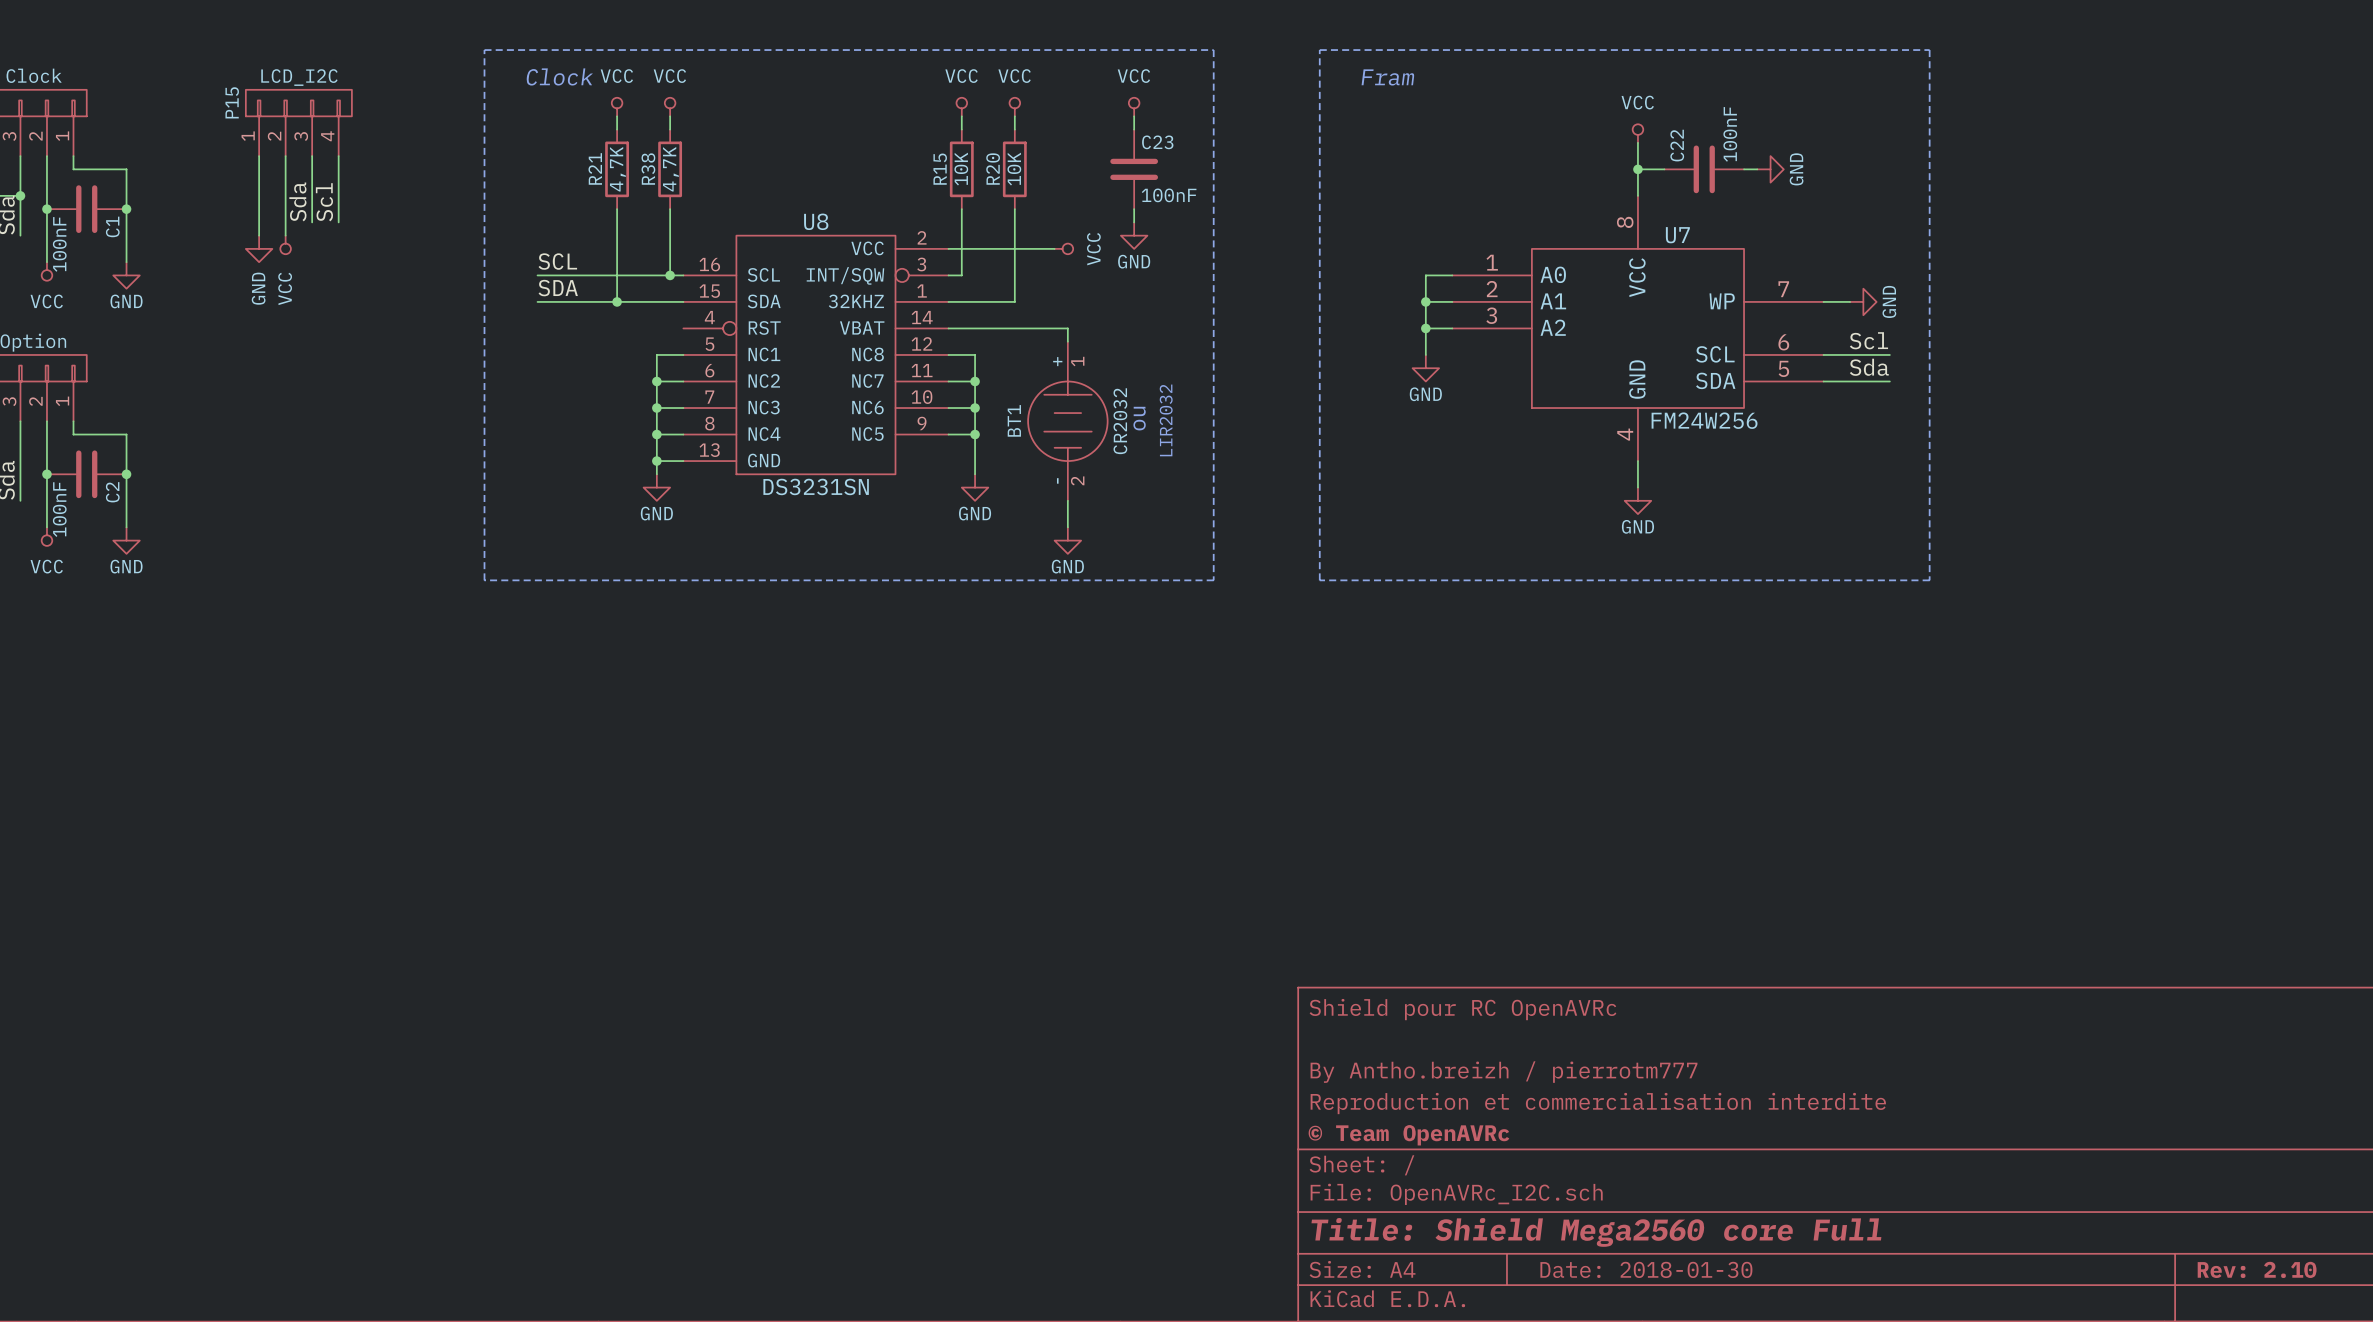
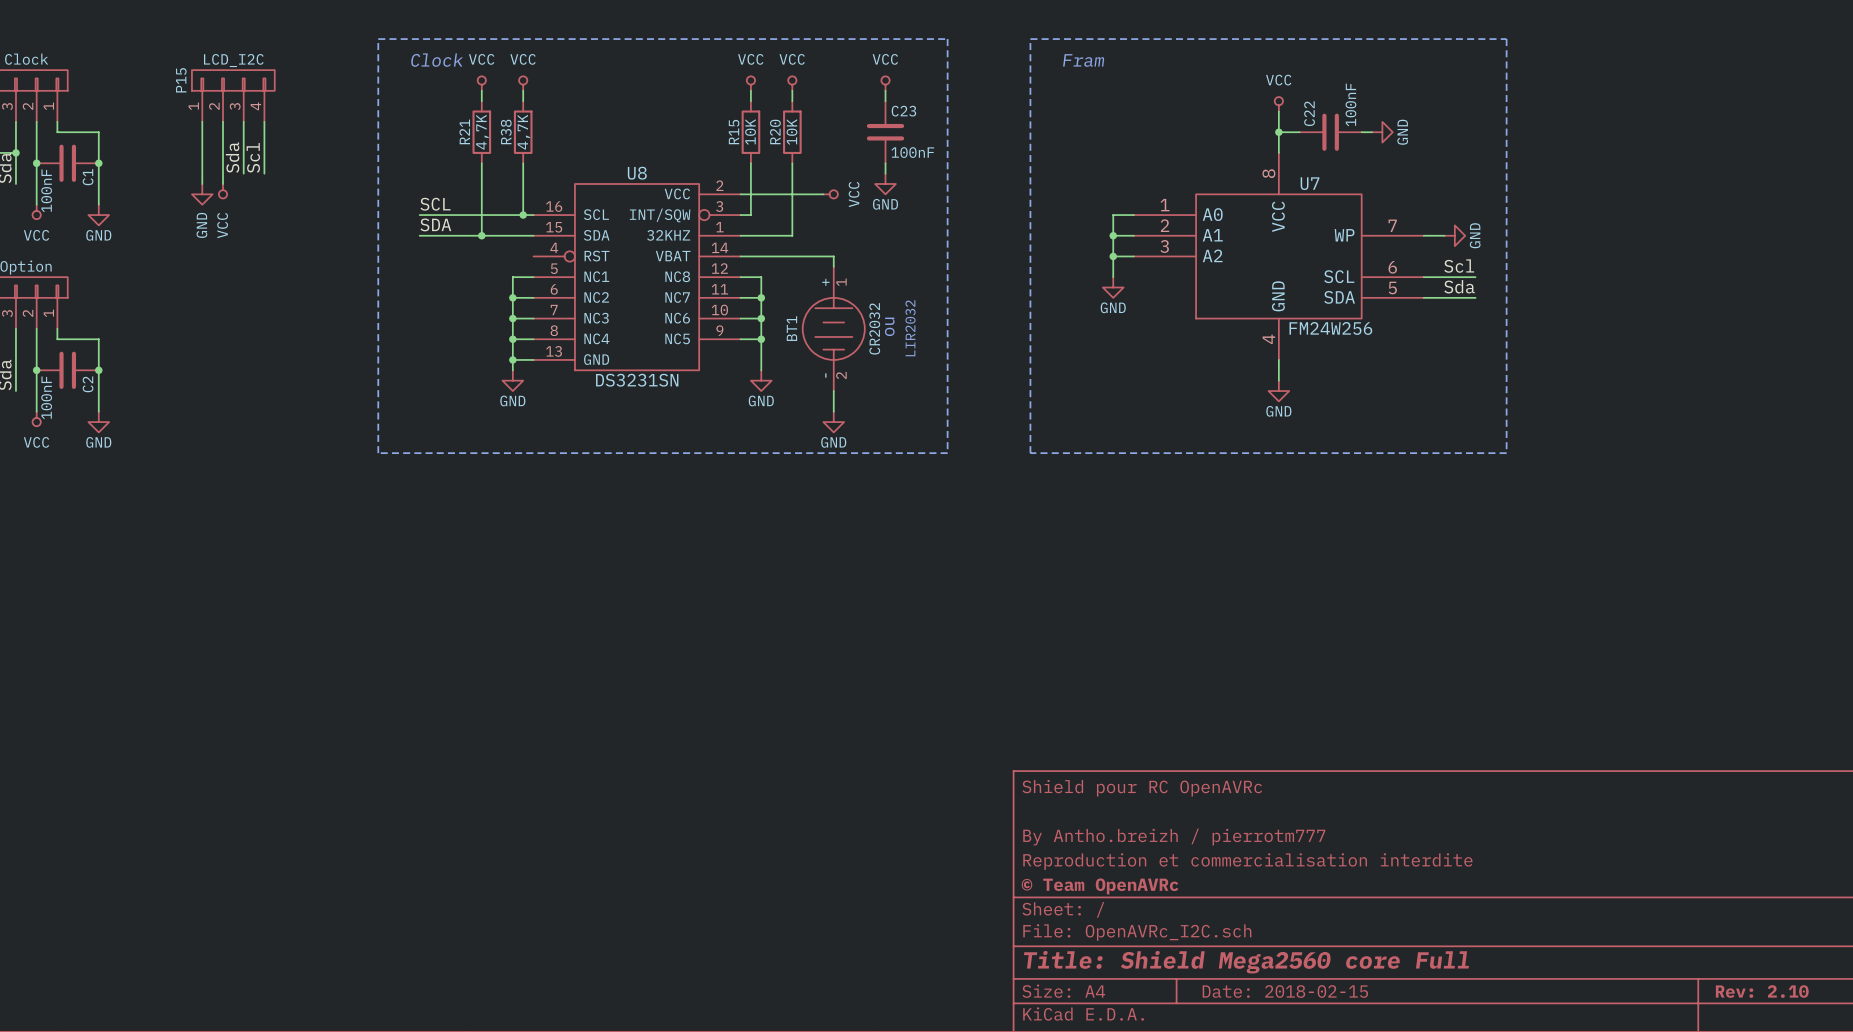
title block: Date: 2018-01-30 (1646, 1269) -> Date: 2018-02-15 (1285, 991)

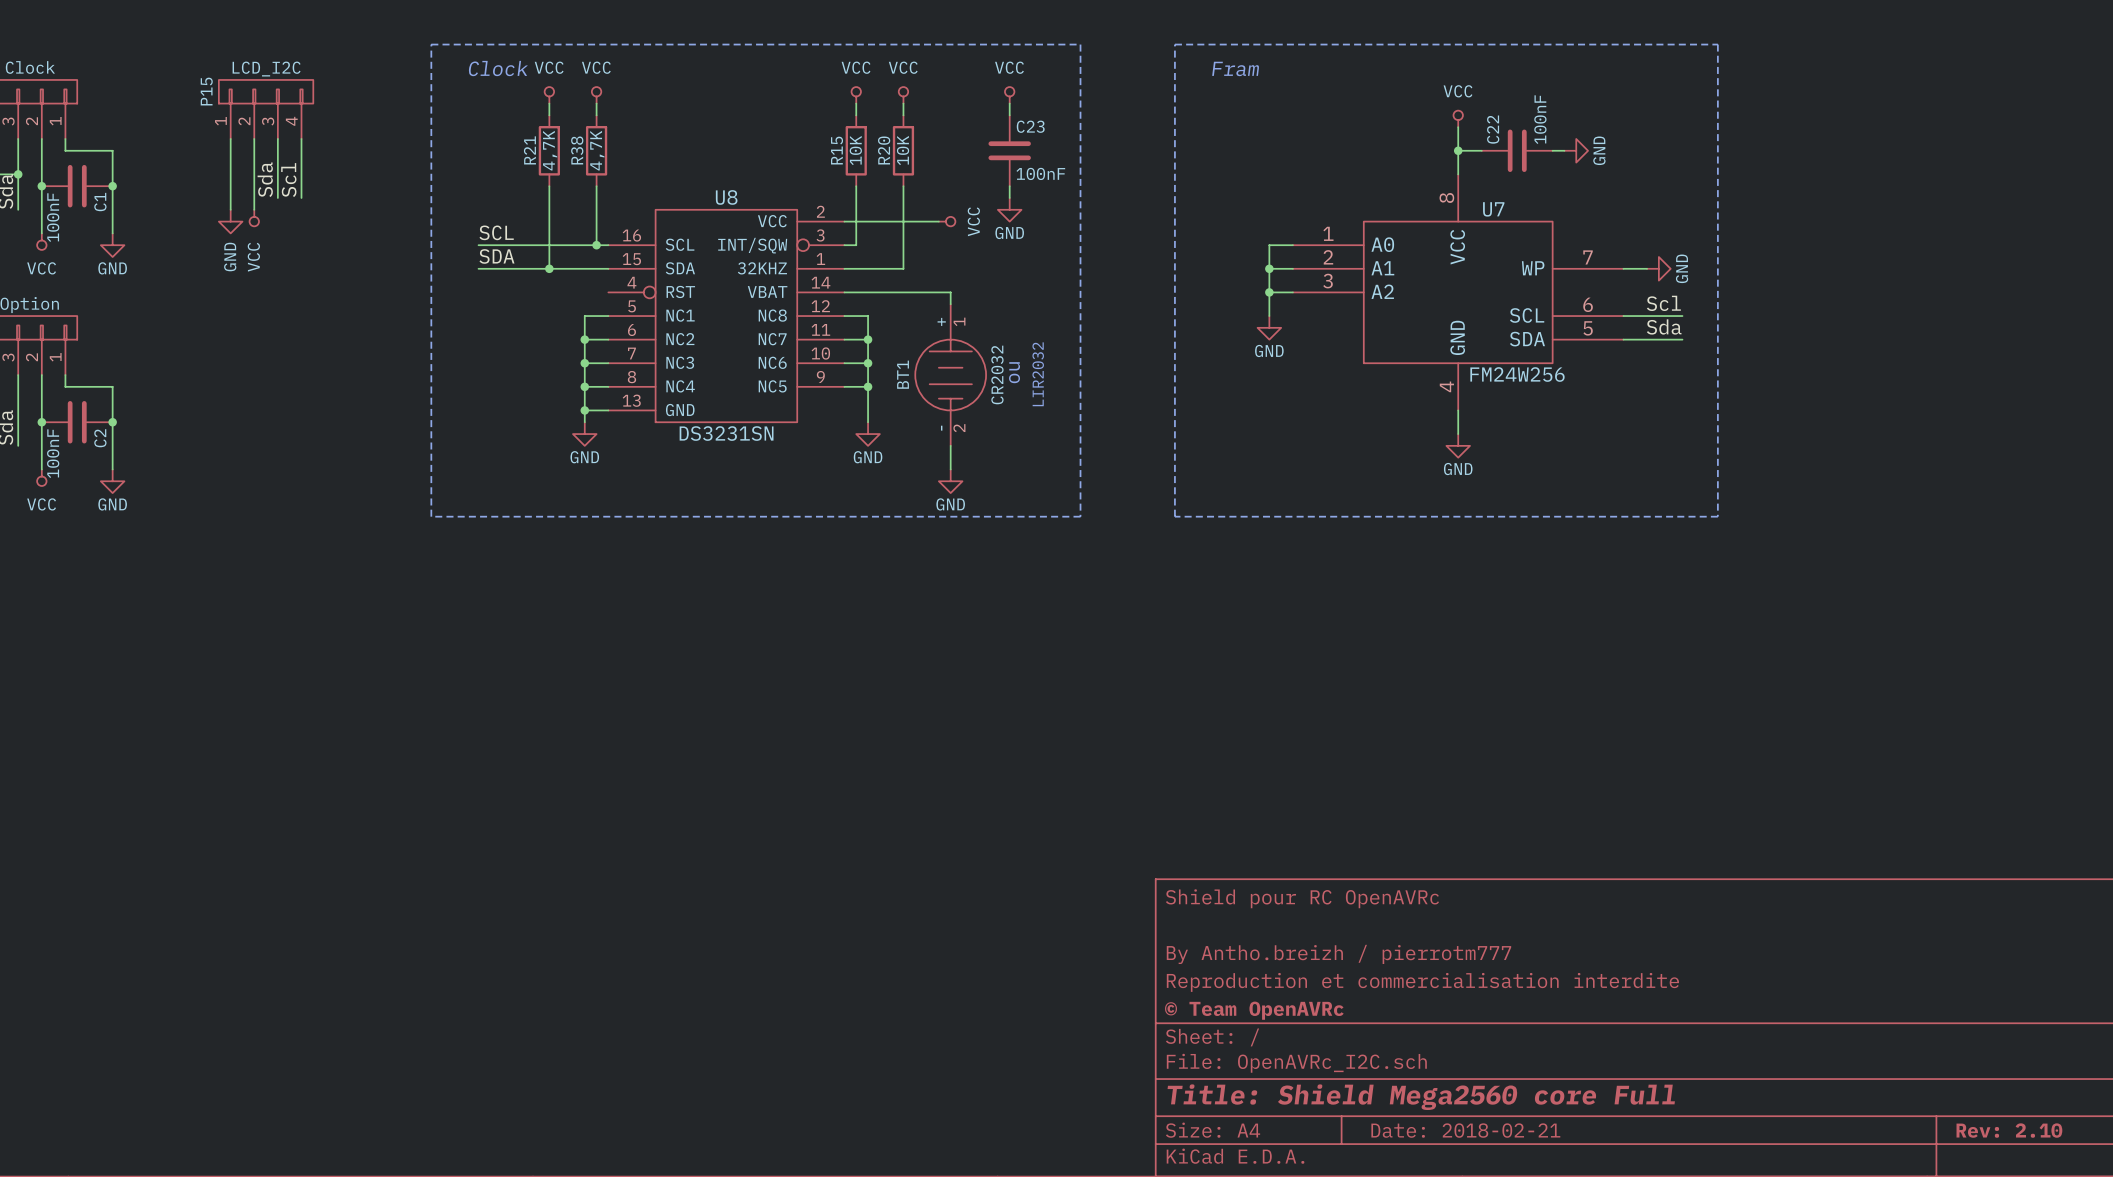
title block: Date: 2018-02-15 (1285, 991) -> Date: 2018-02-21 (1465, 1130)

